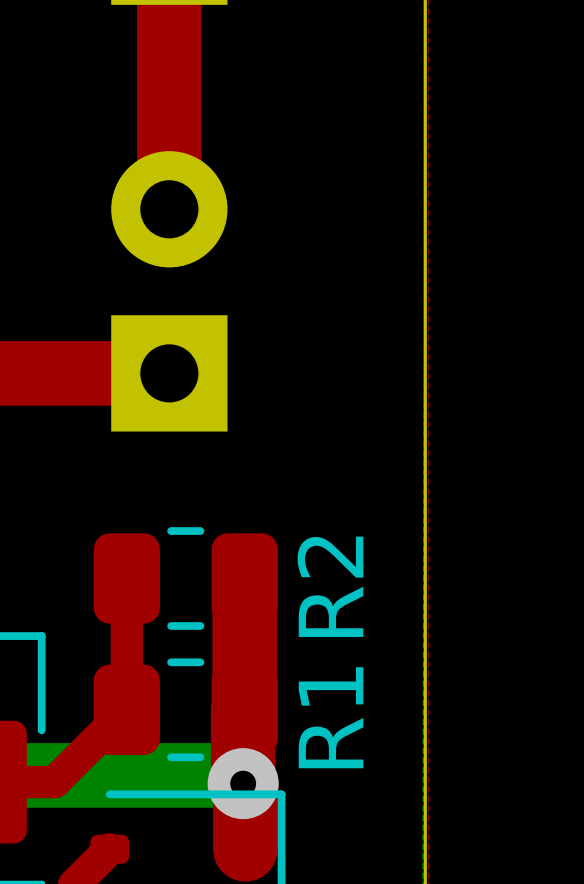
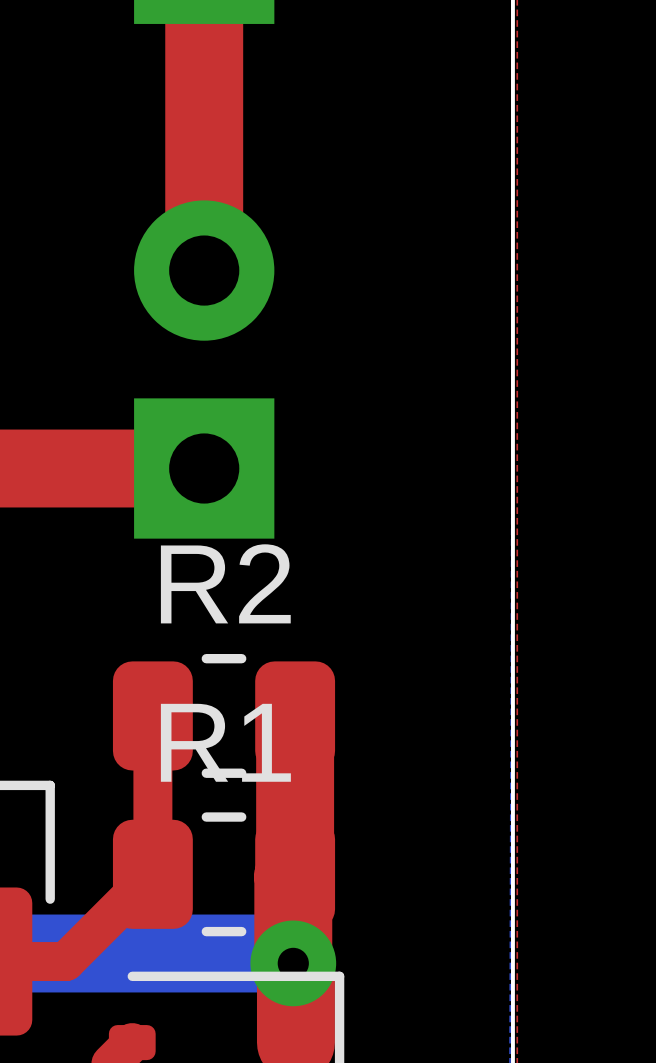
R2 name rotation: 0° (330, 586) -> 90° clockwise (225, 583)
R2 name position: R2 (330, 586) -> R2 (225, 583)
R1 name rotation: 0° (331, 717) -> 90° clockwise (225, 742)
R1 name position: R1 (331, 717) -> R1 (225, 742)

